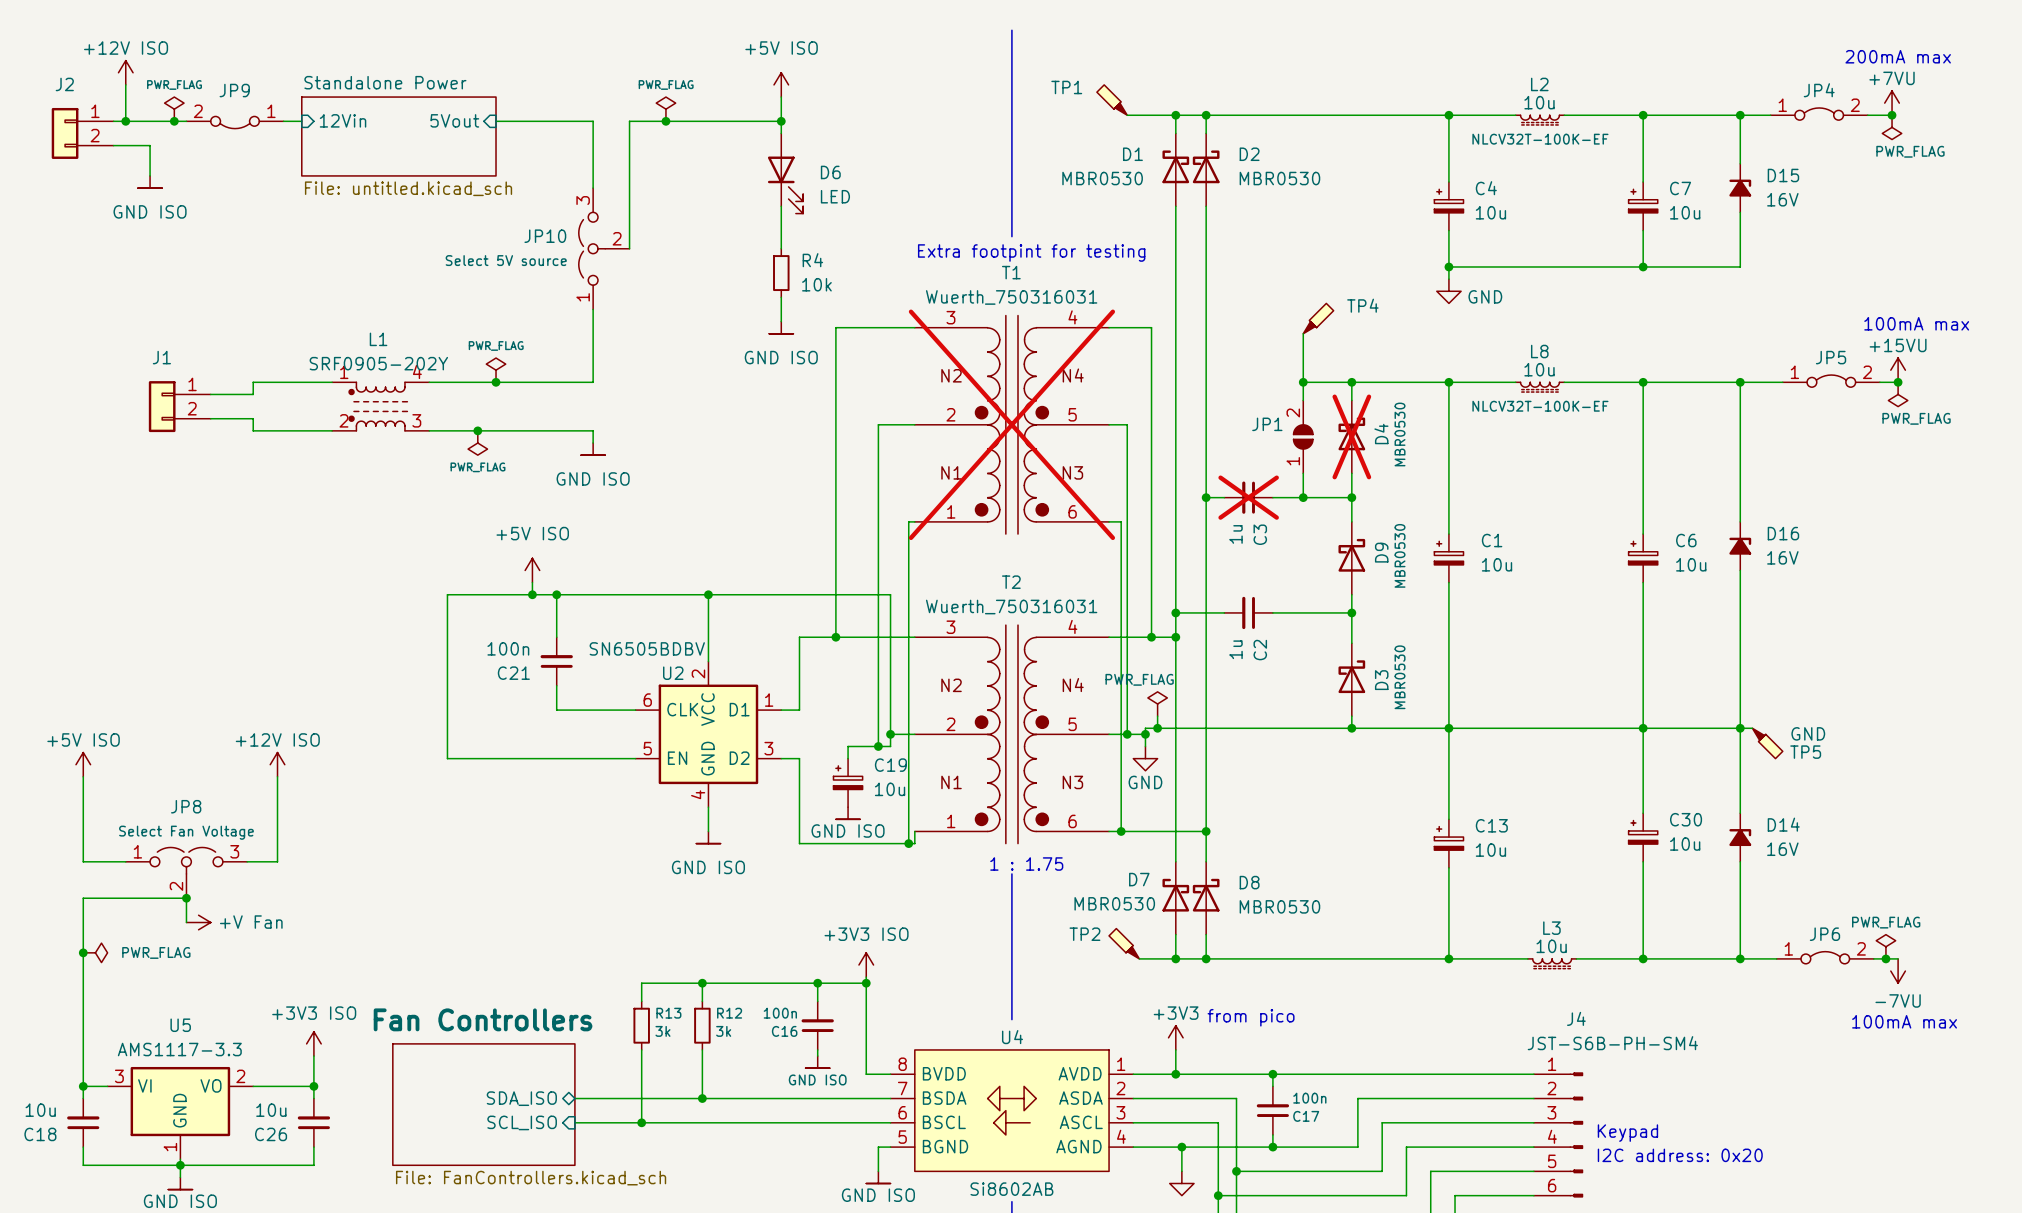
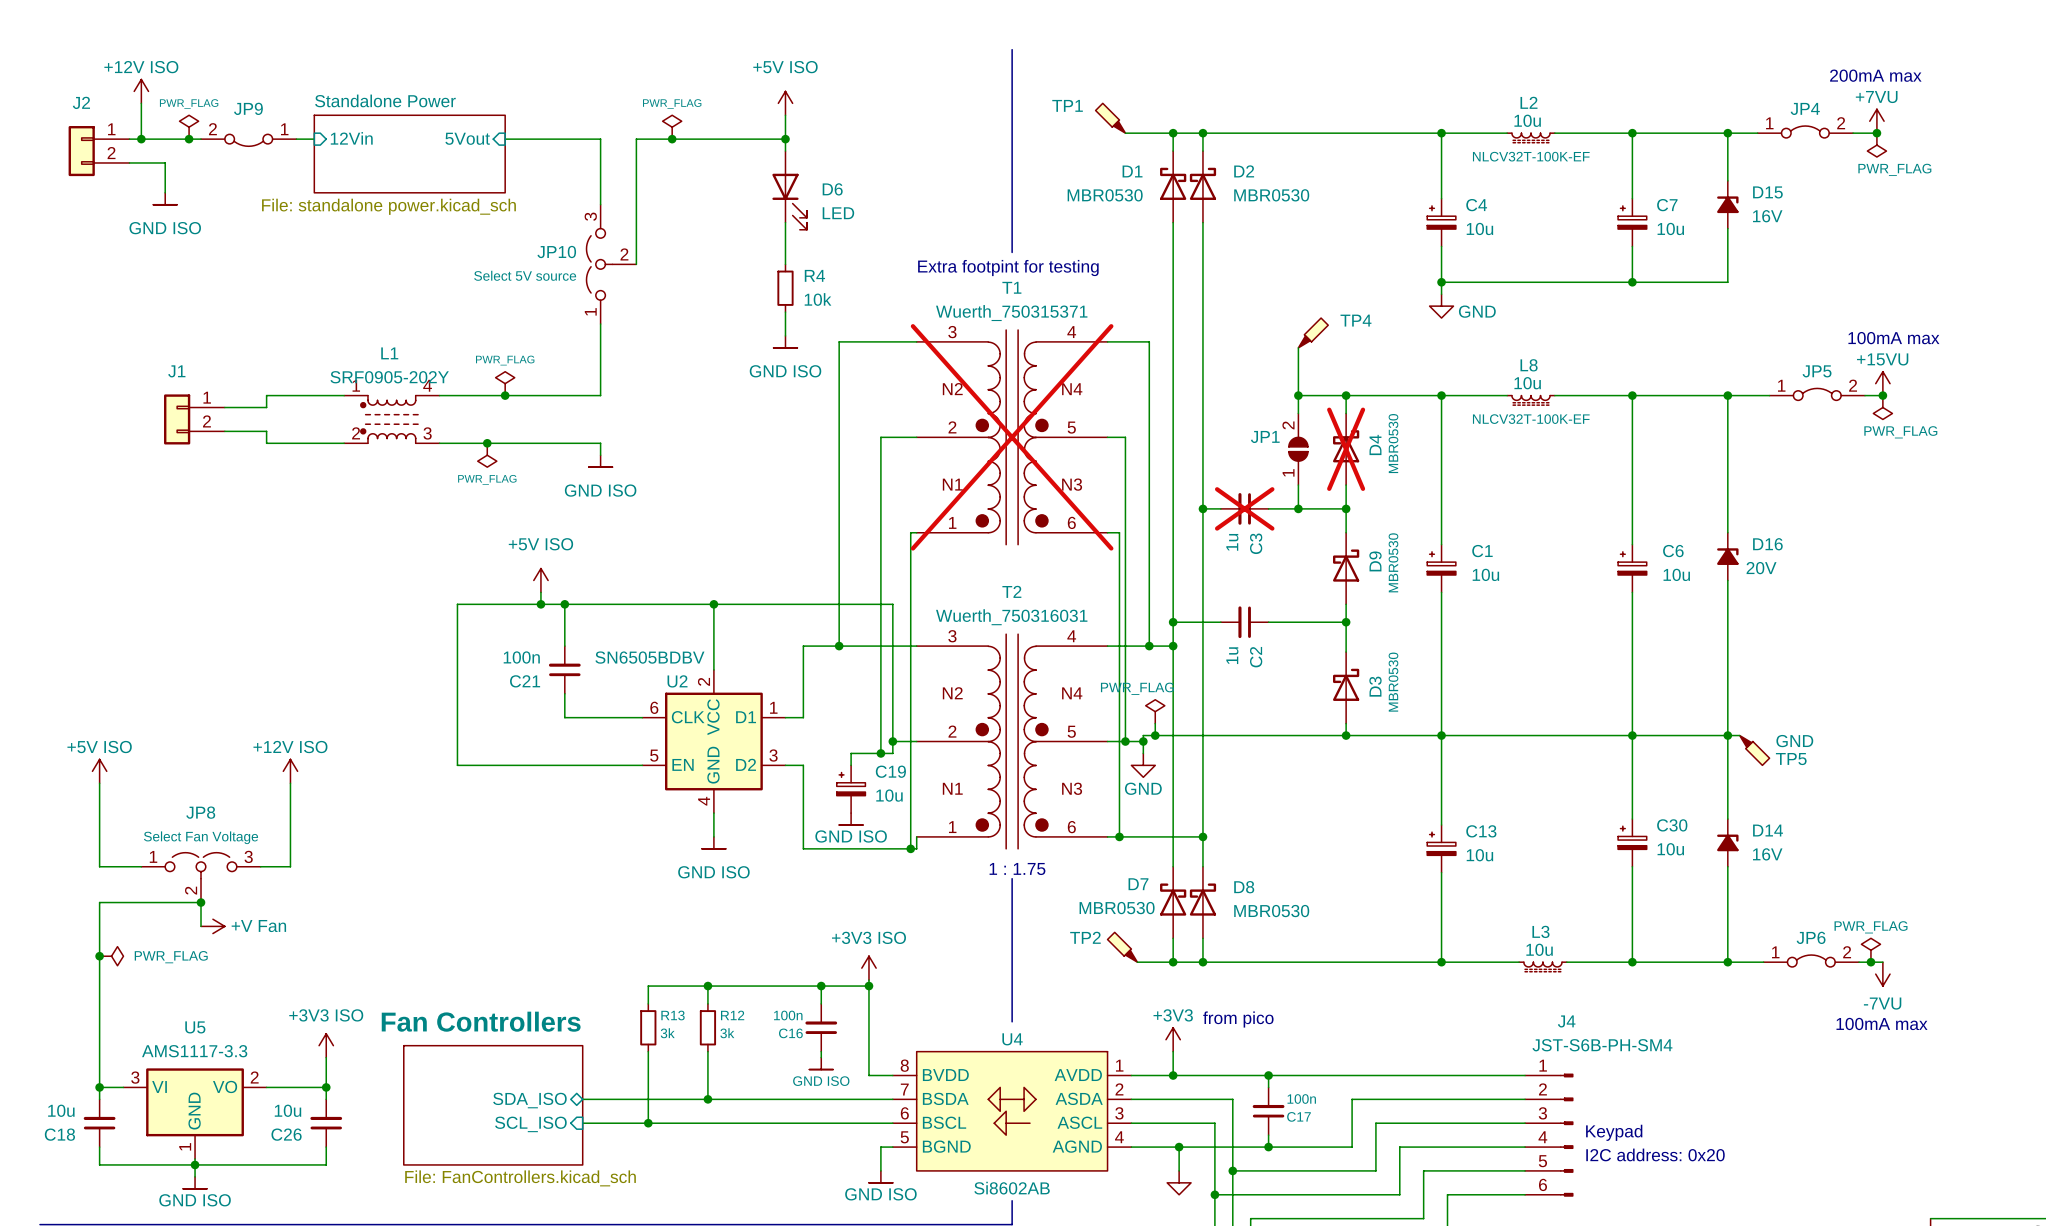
sheet Standalone Power value: File: untitled.kicad_sch (408, 188) -> File: standalone power.kicad_sch (388, 206)
T1 value: Wuerth_750316031 (1011, 297) -> Wuerth_750315371 (1011, 313)
D16 value: 16V (1782, 557) -> 20V (1761, 568)

